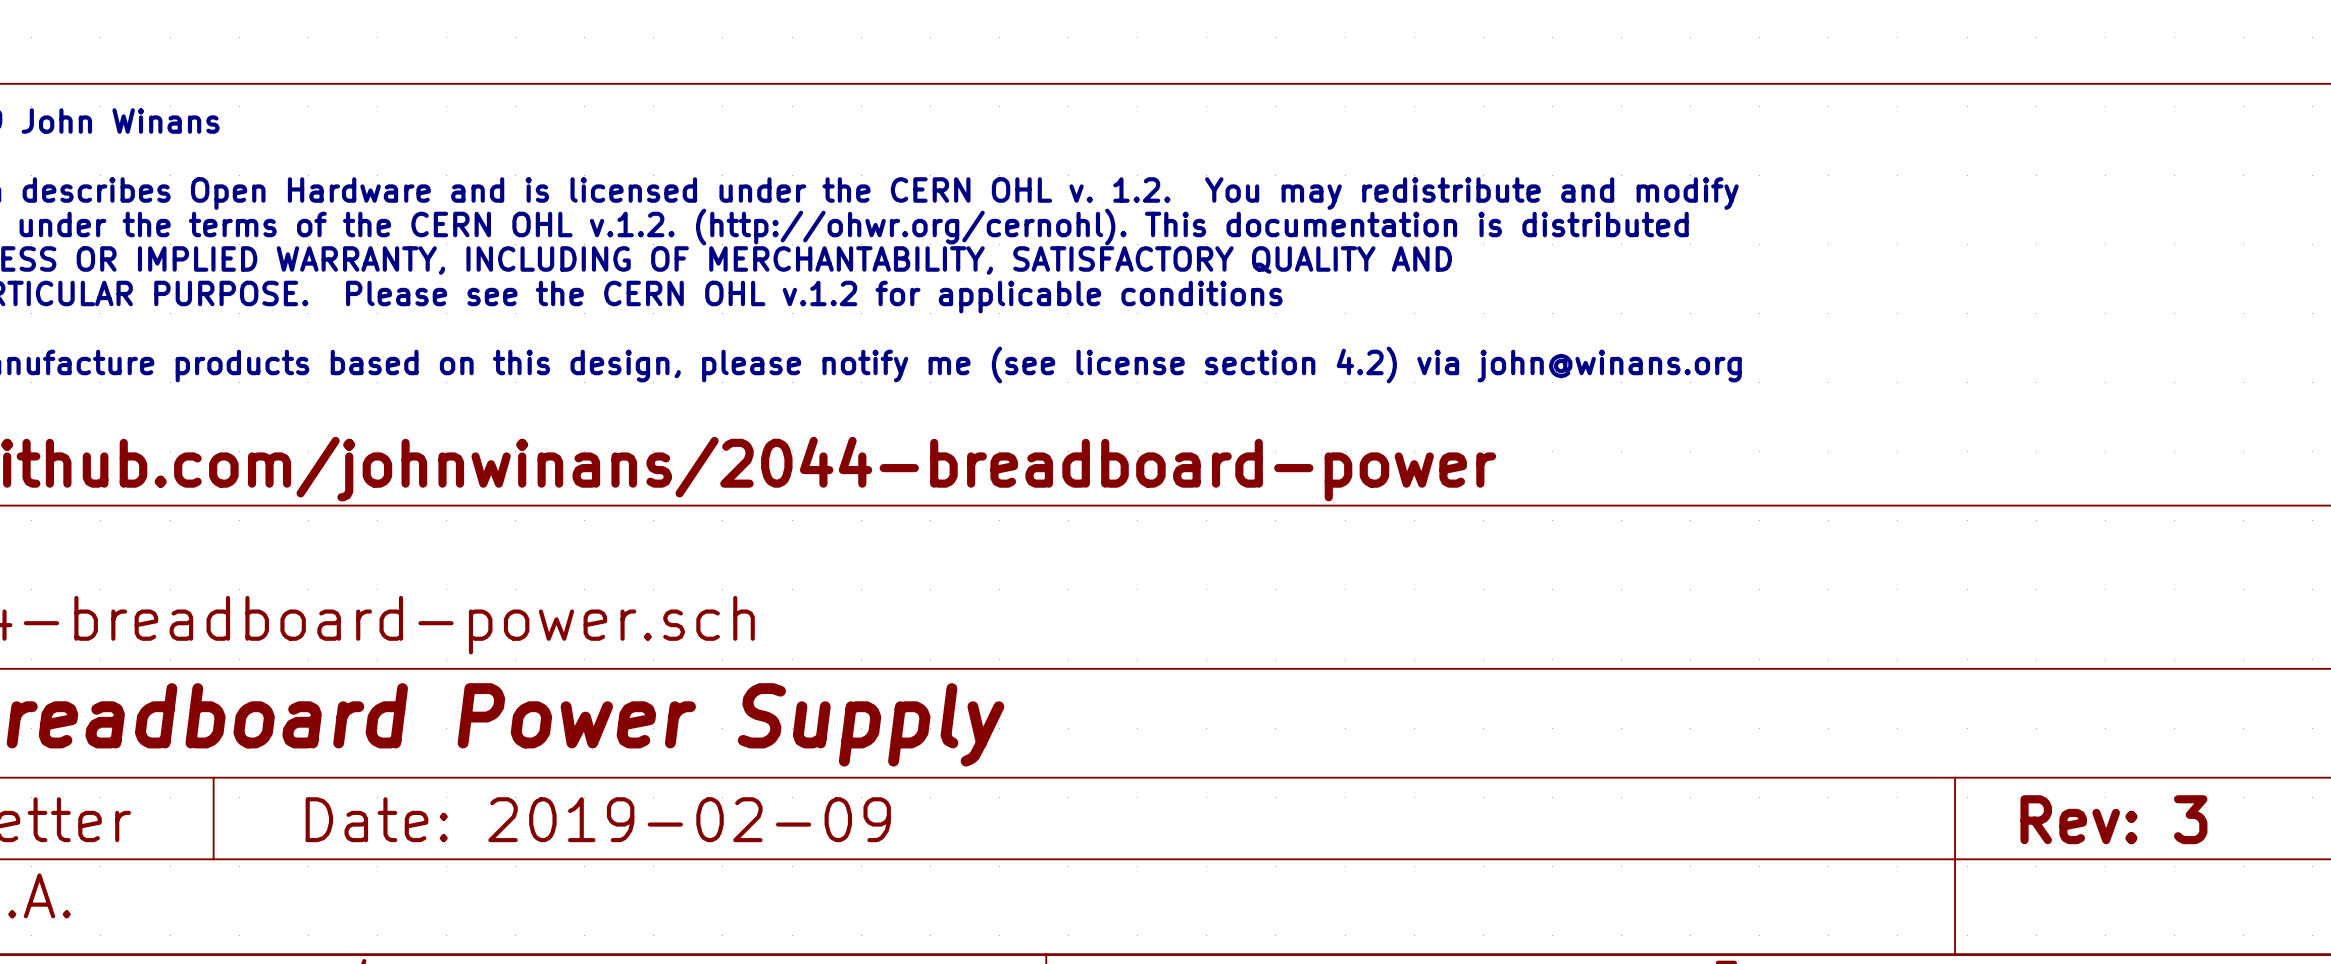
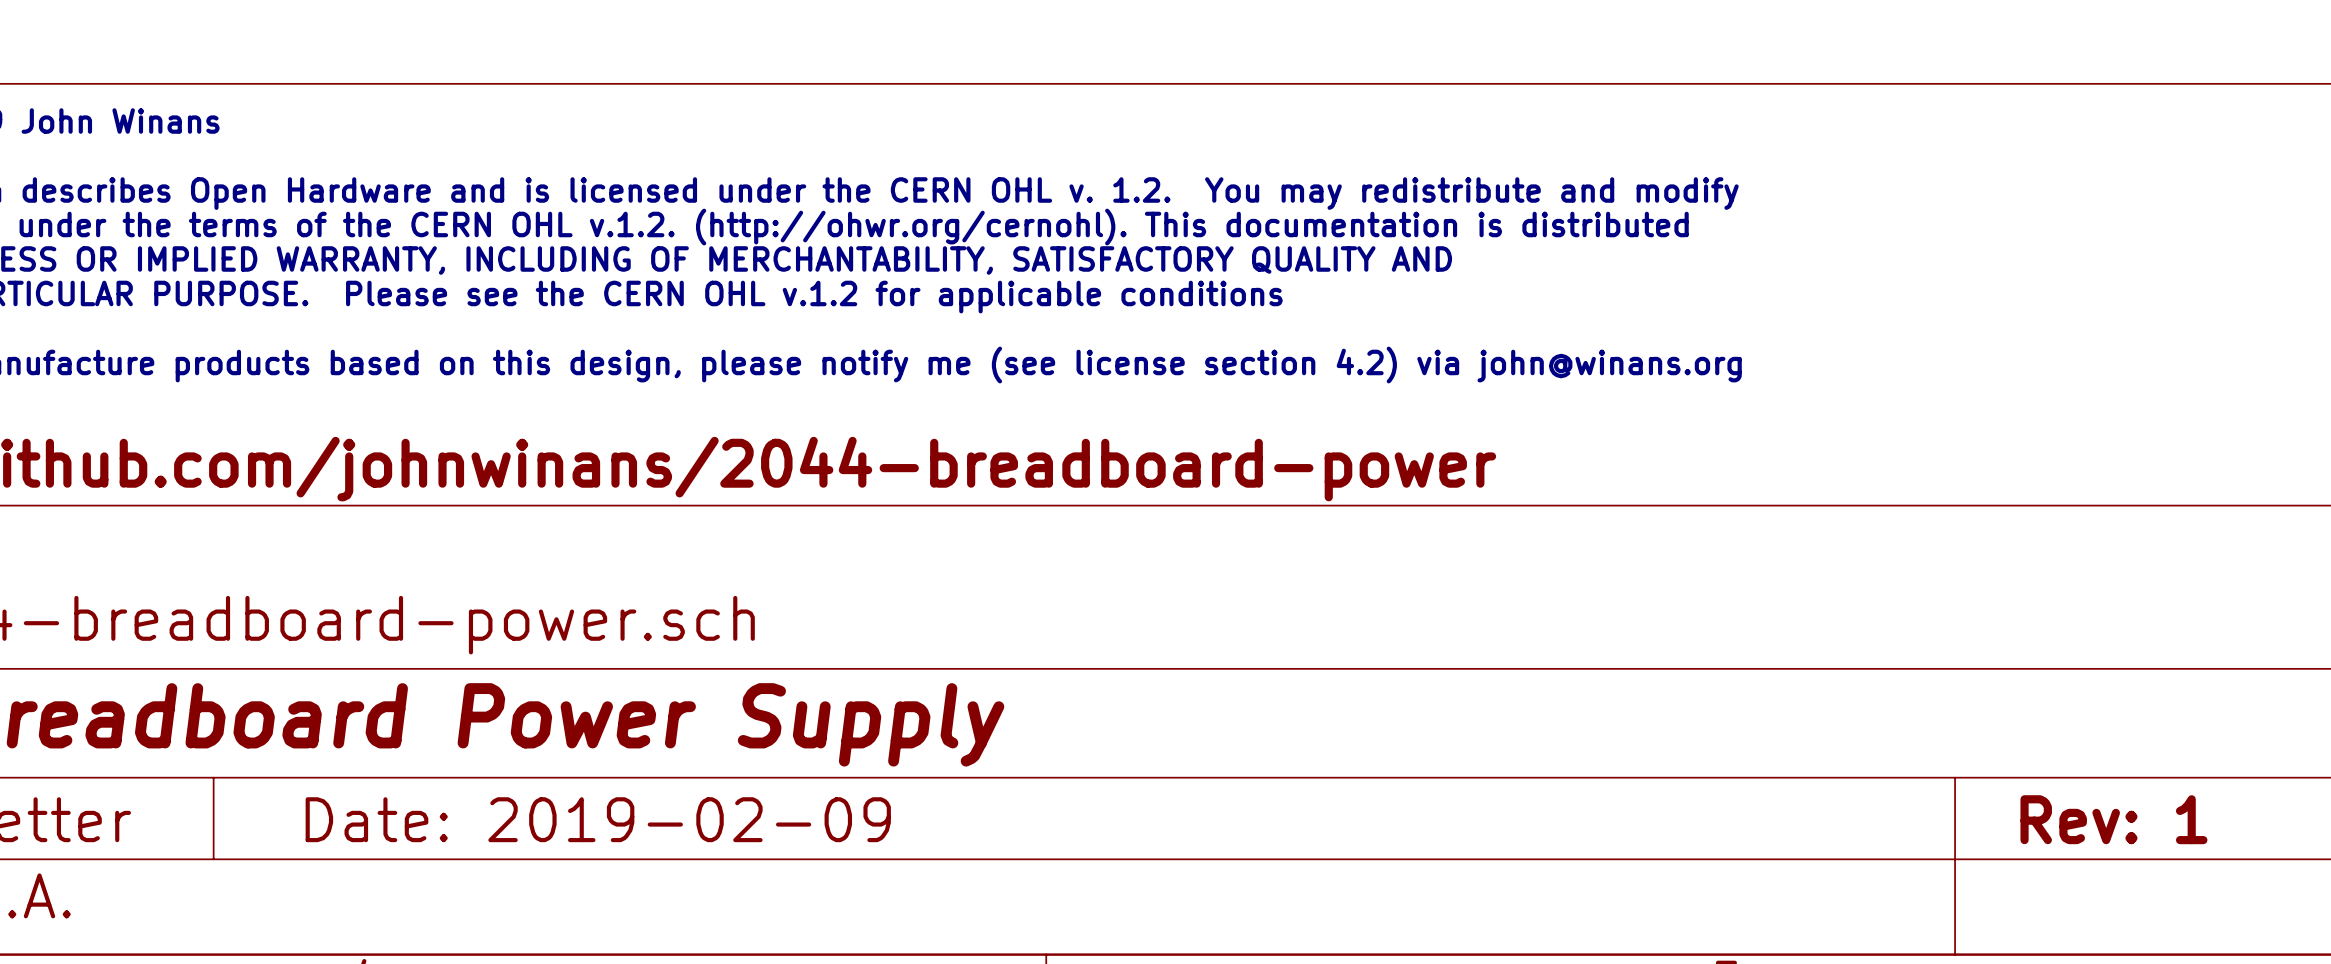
title block: Rev: 3 (2113, 819) -> Rev: 1 (2113, 819)

